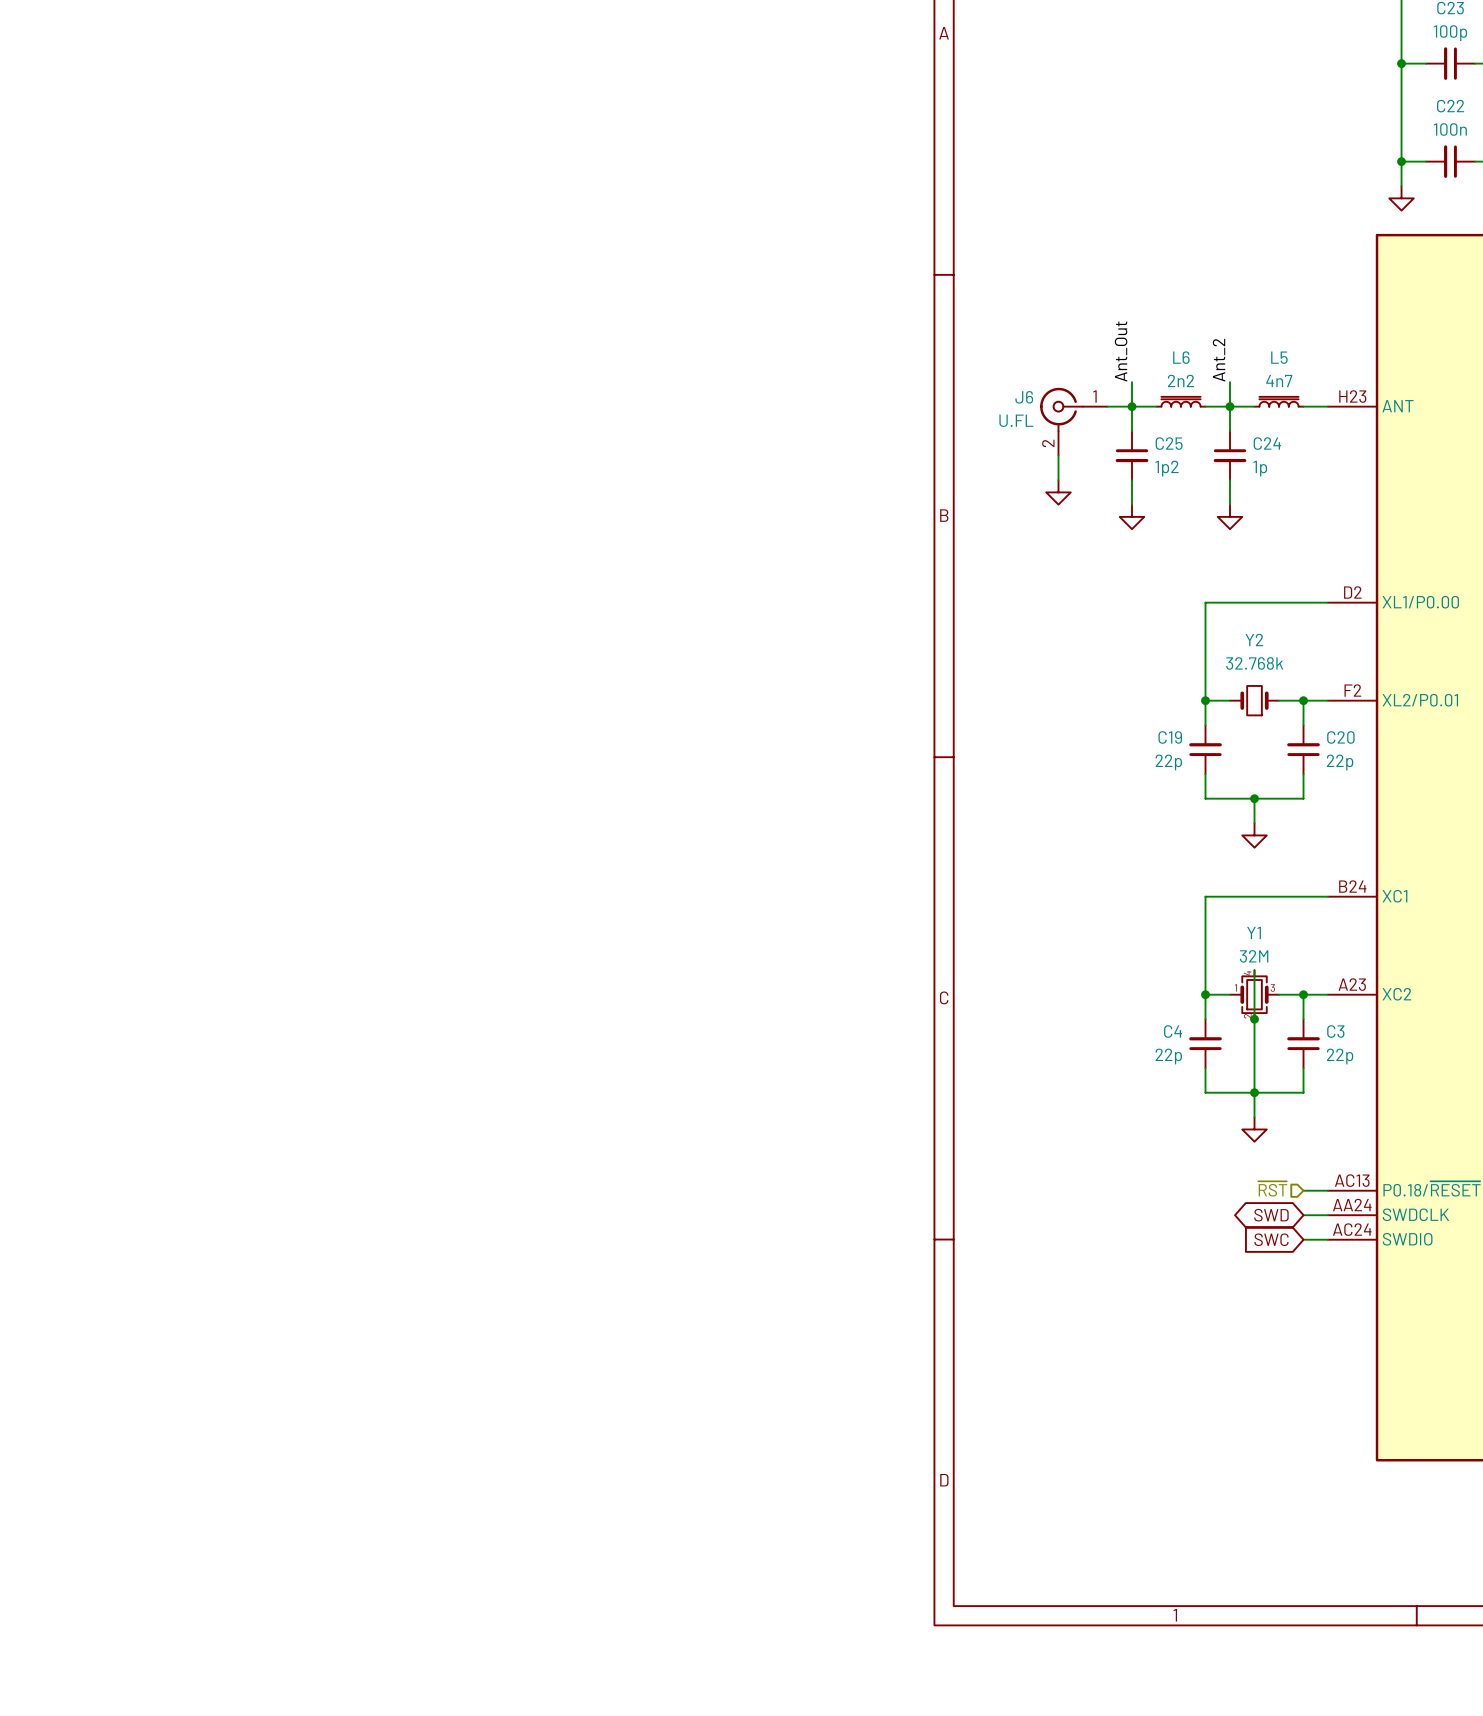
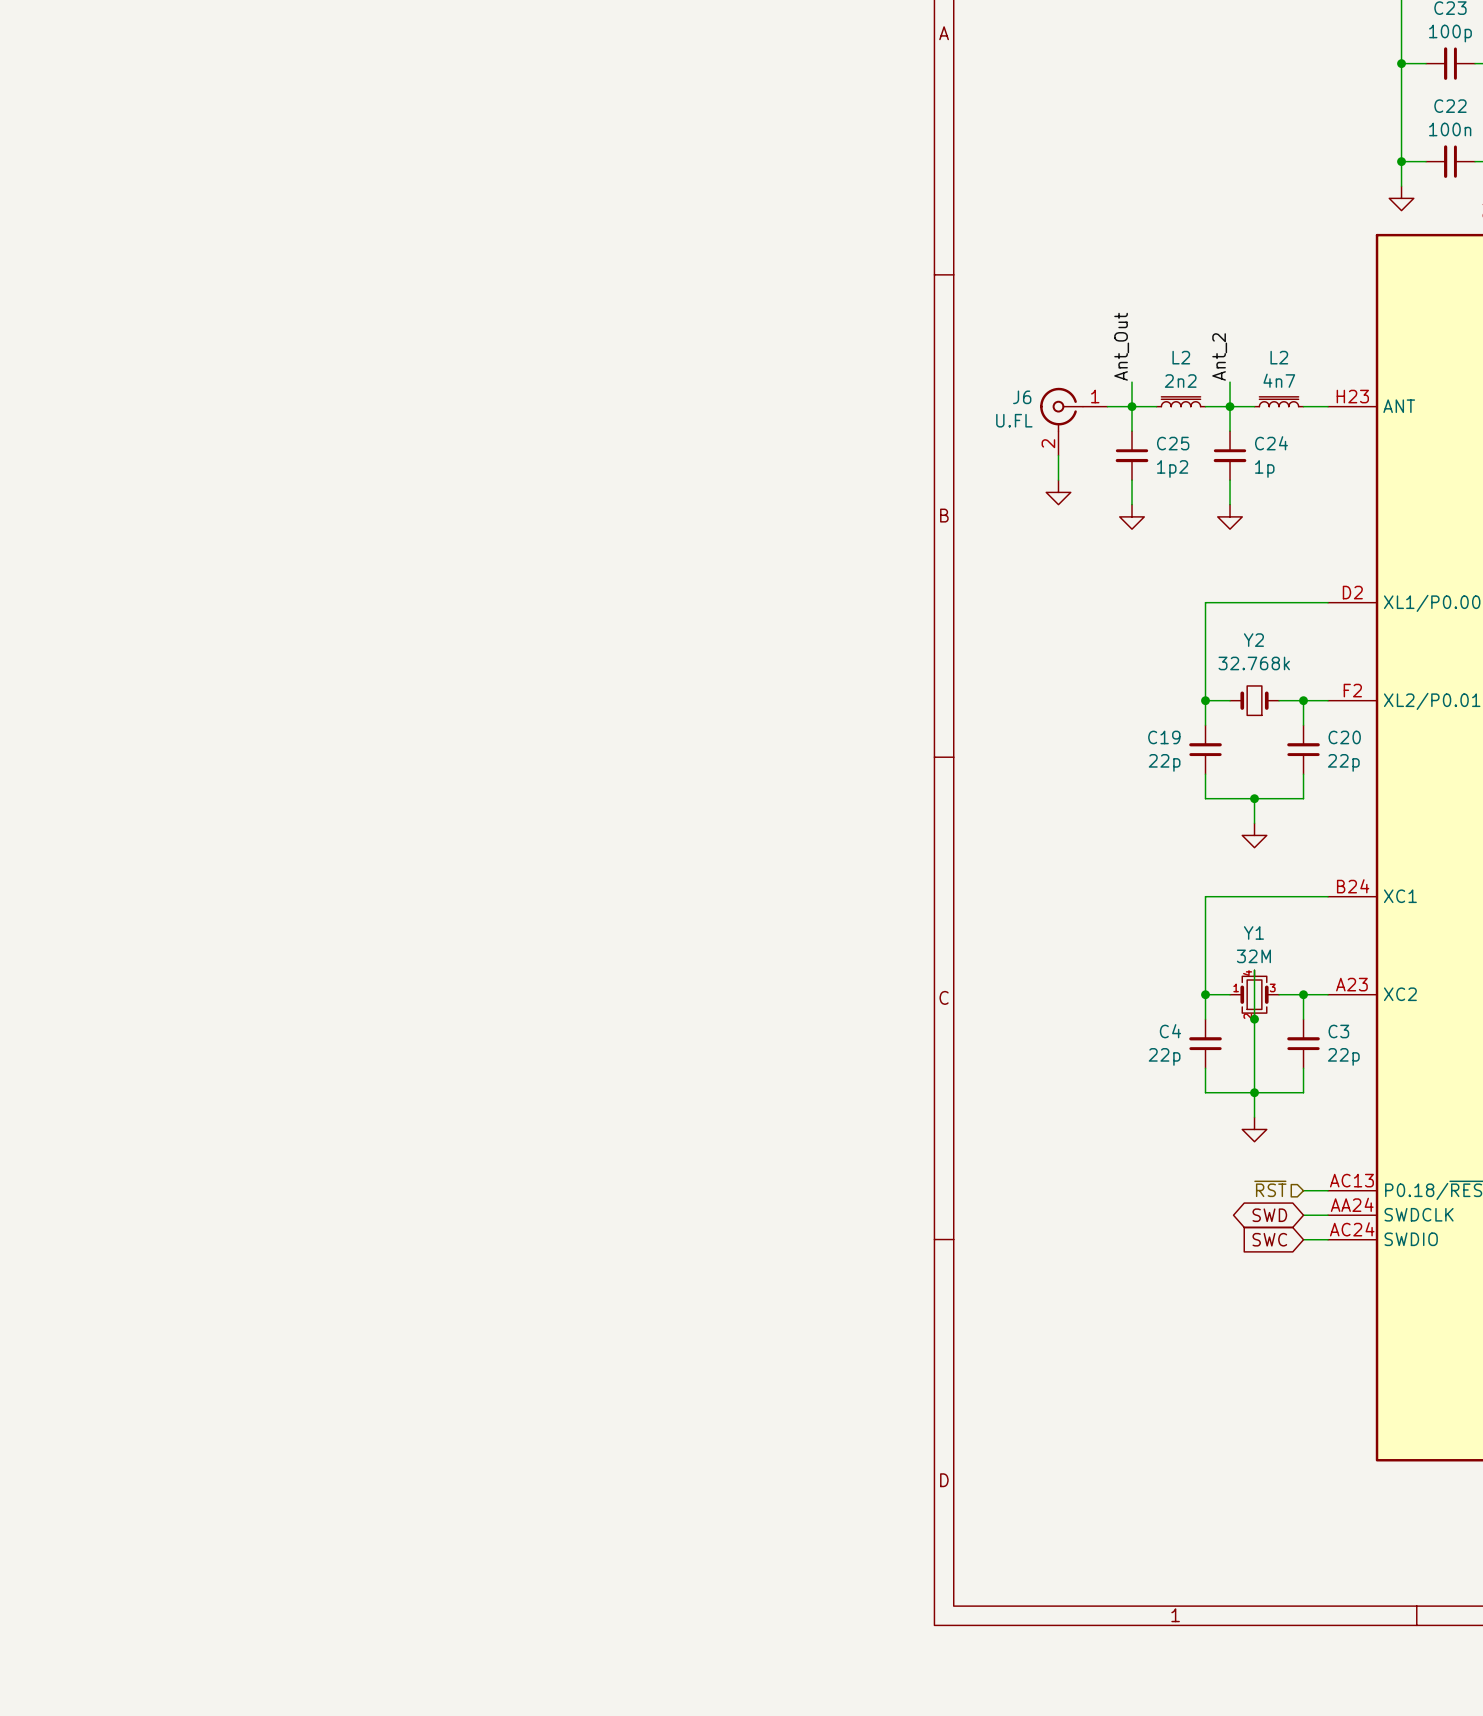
L6 name: L6 (1181, 357) -> L2 (1181, 357)
L5 name: L5 (1279, 357) -> L2 (1279, 357)

